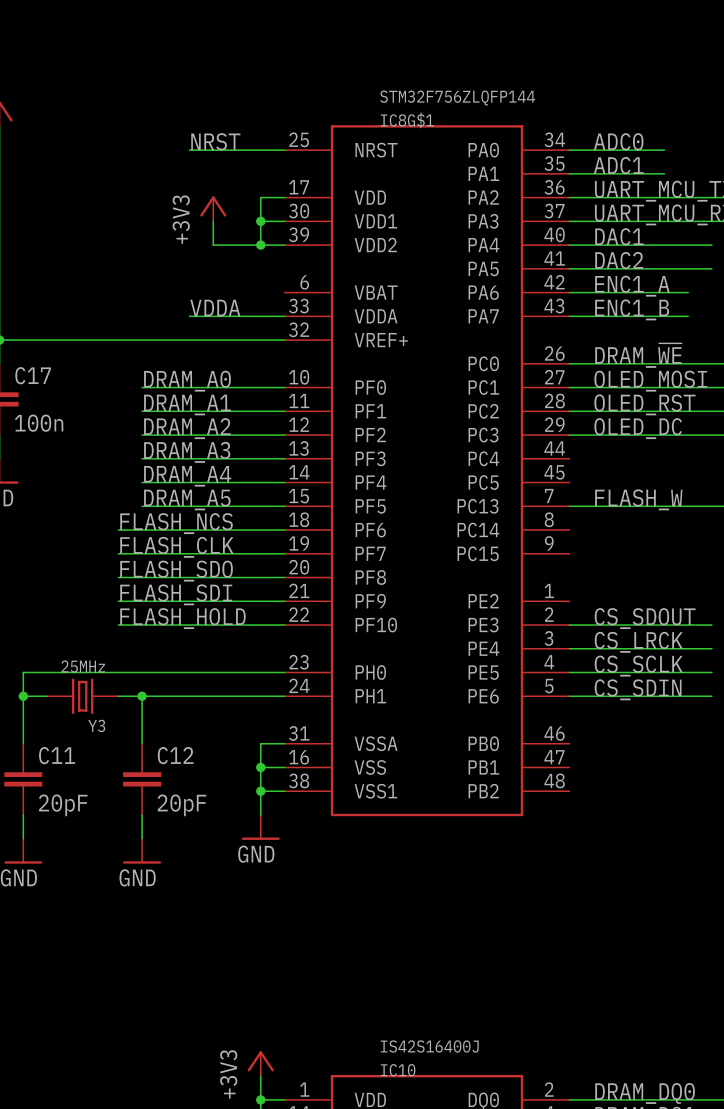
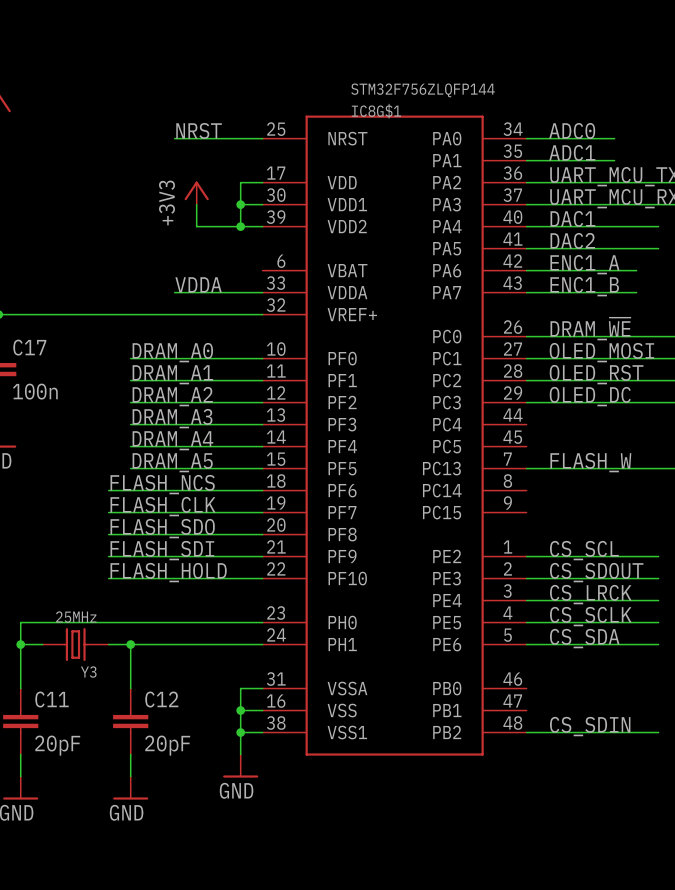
label: none -> CS_SCL (584, 550)
wire: none -> (526, 556) (658, 556)
label: CS_SDIN (638, 689) -> CS_SDA (584, 638)
label: none -> CS_SDIN (590, 726)
wire: none -> (526, 732) (658, 732)

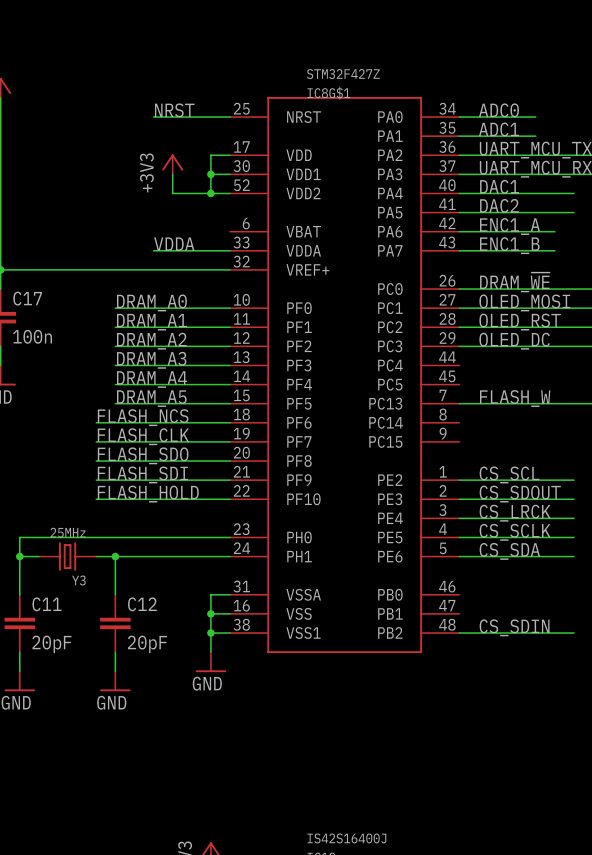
IC8G$1 value: STM32F756ZLQFP144 (423, 90) -> STM32F427Z (343, 74)
IC8G$1 pin number: 39 (276, 217) -> 52 (241, 185)

